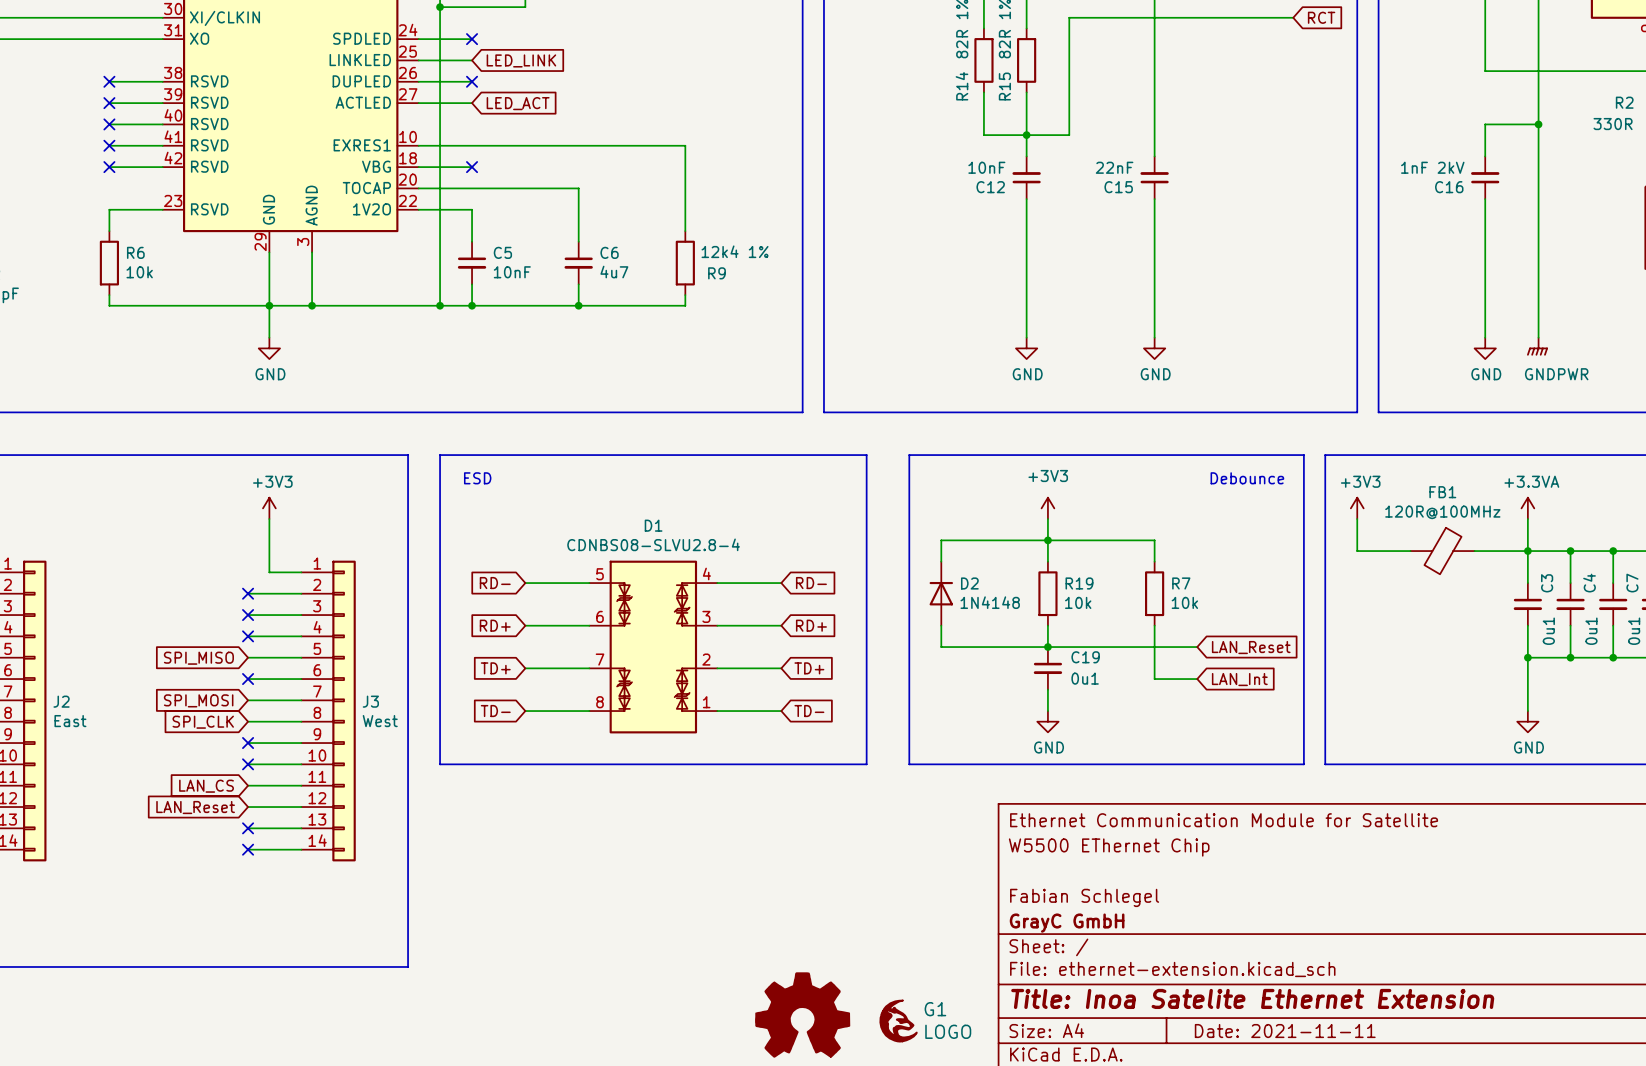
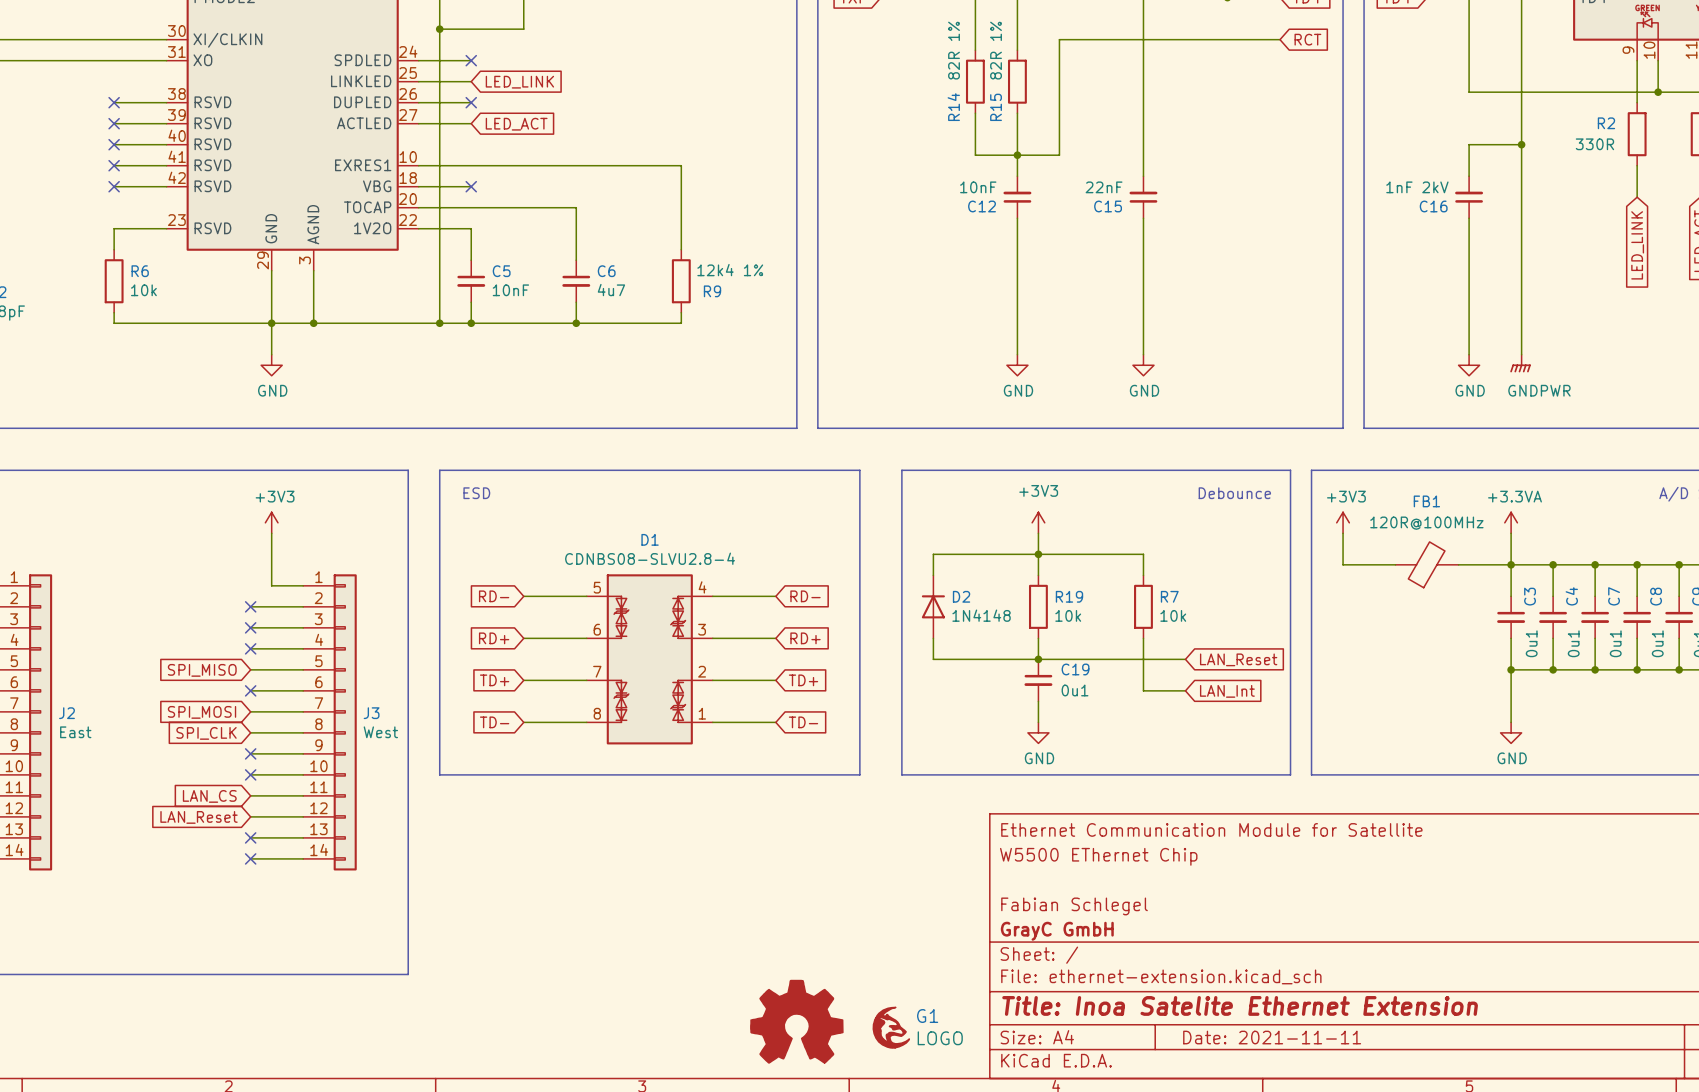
FB1 rotation: 0° (1443, 551) -> 180° (1426, 564)

